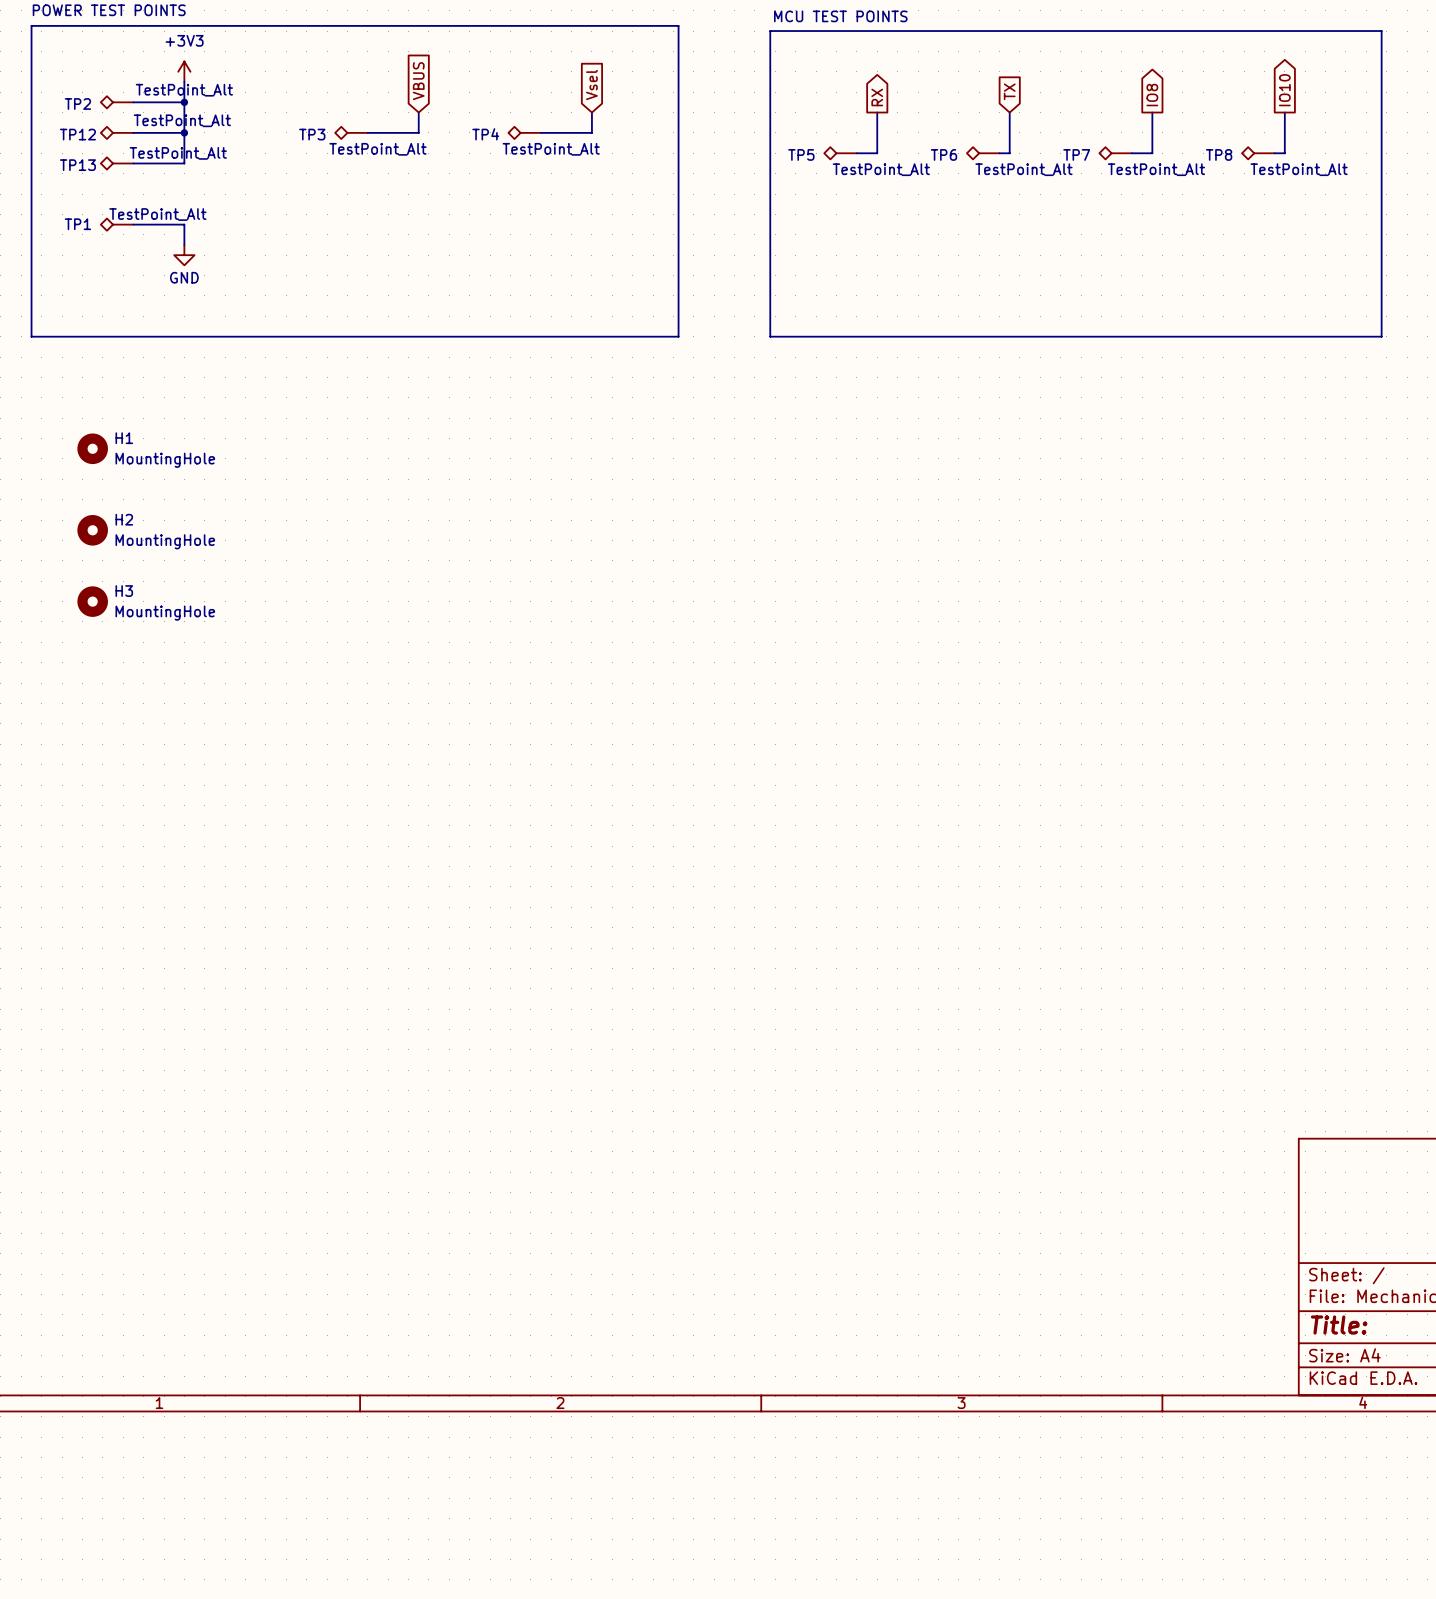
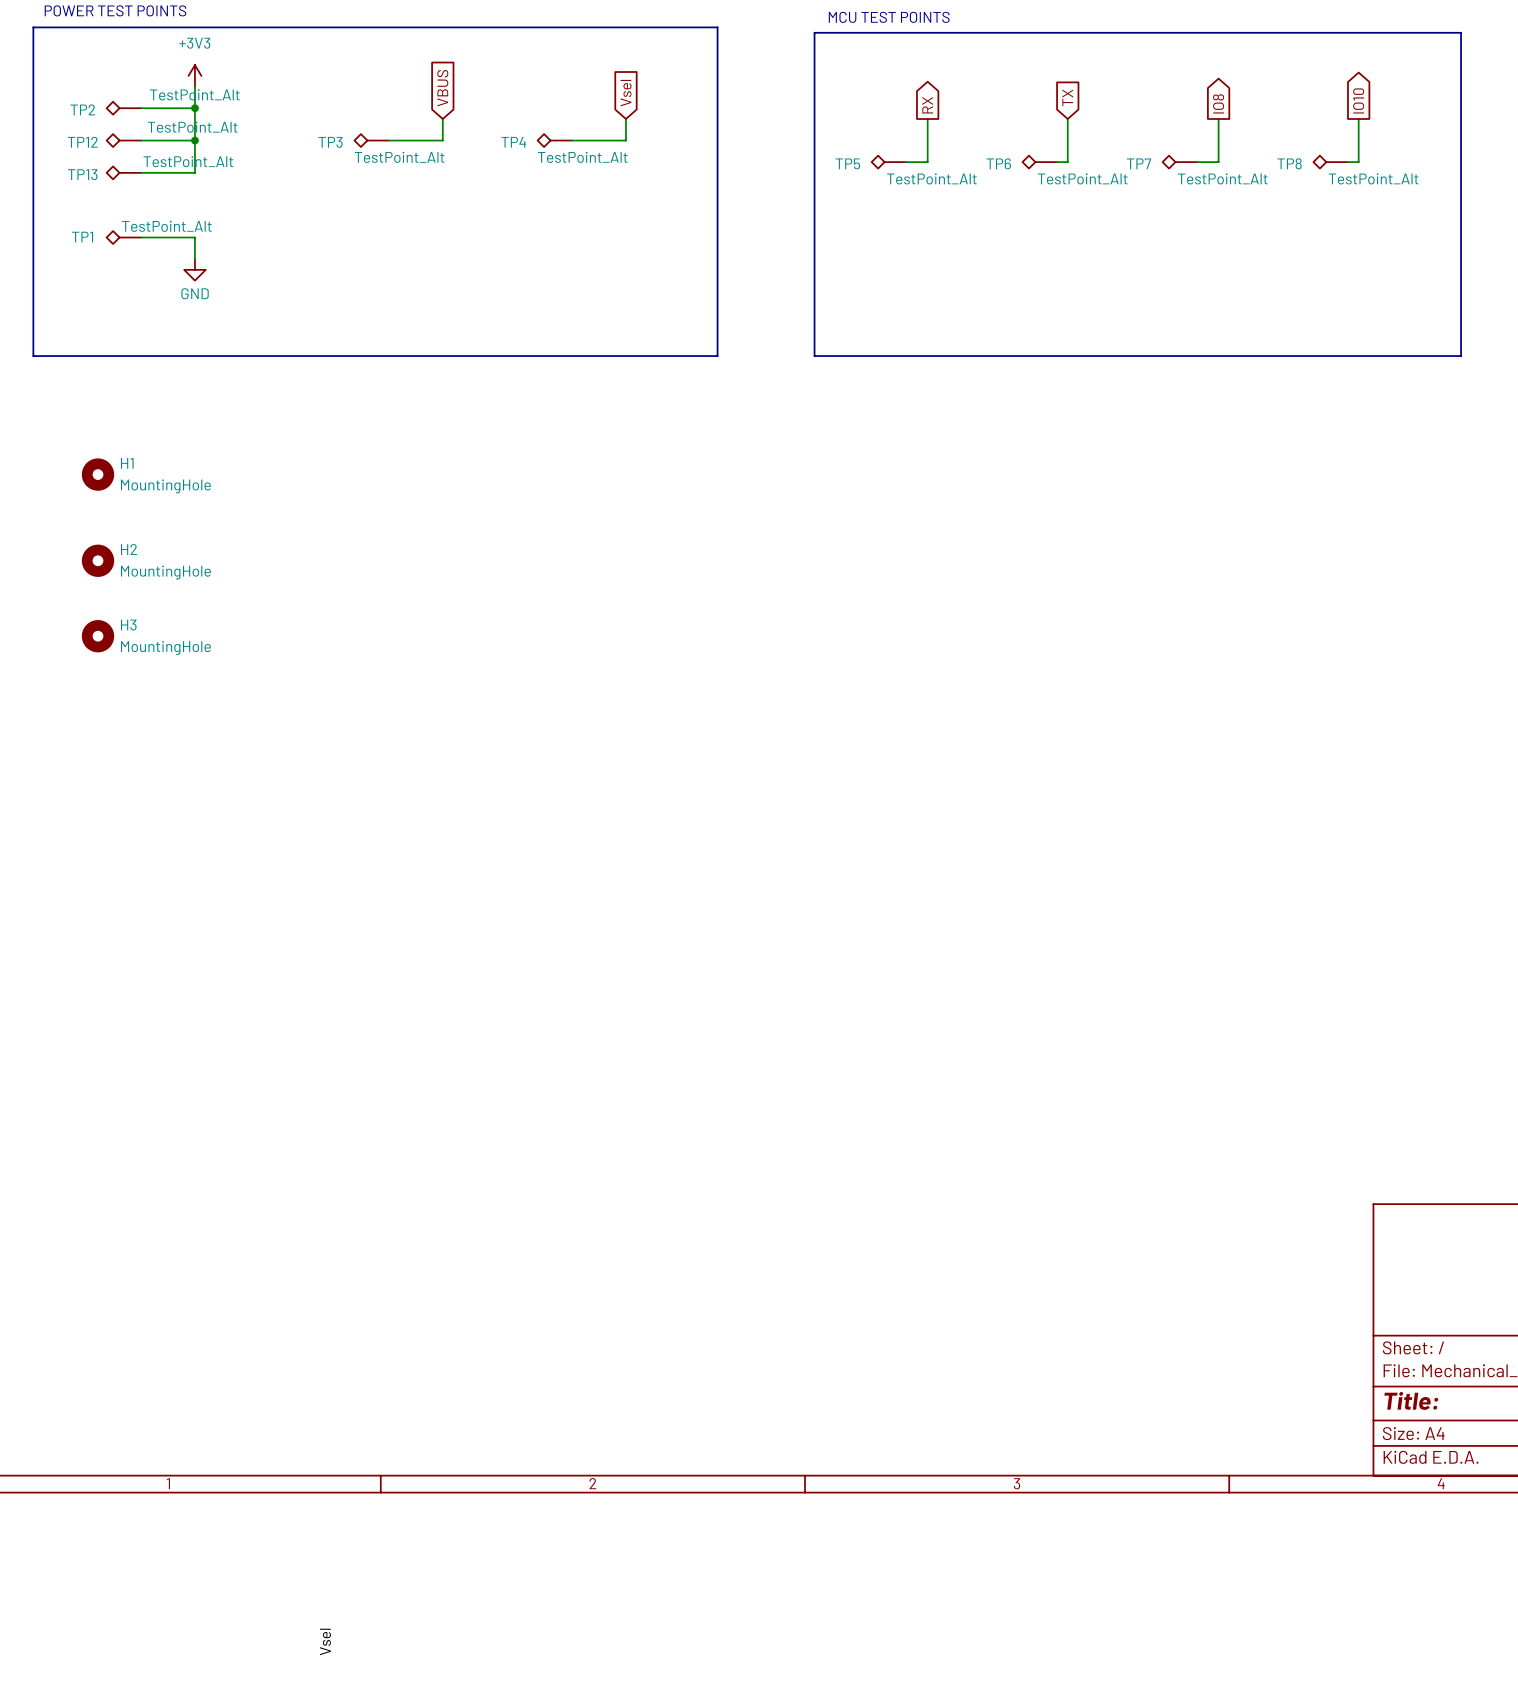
label: none -> Vsel (325, 1641)

